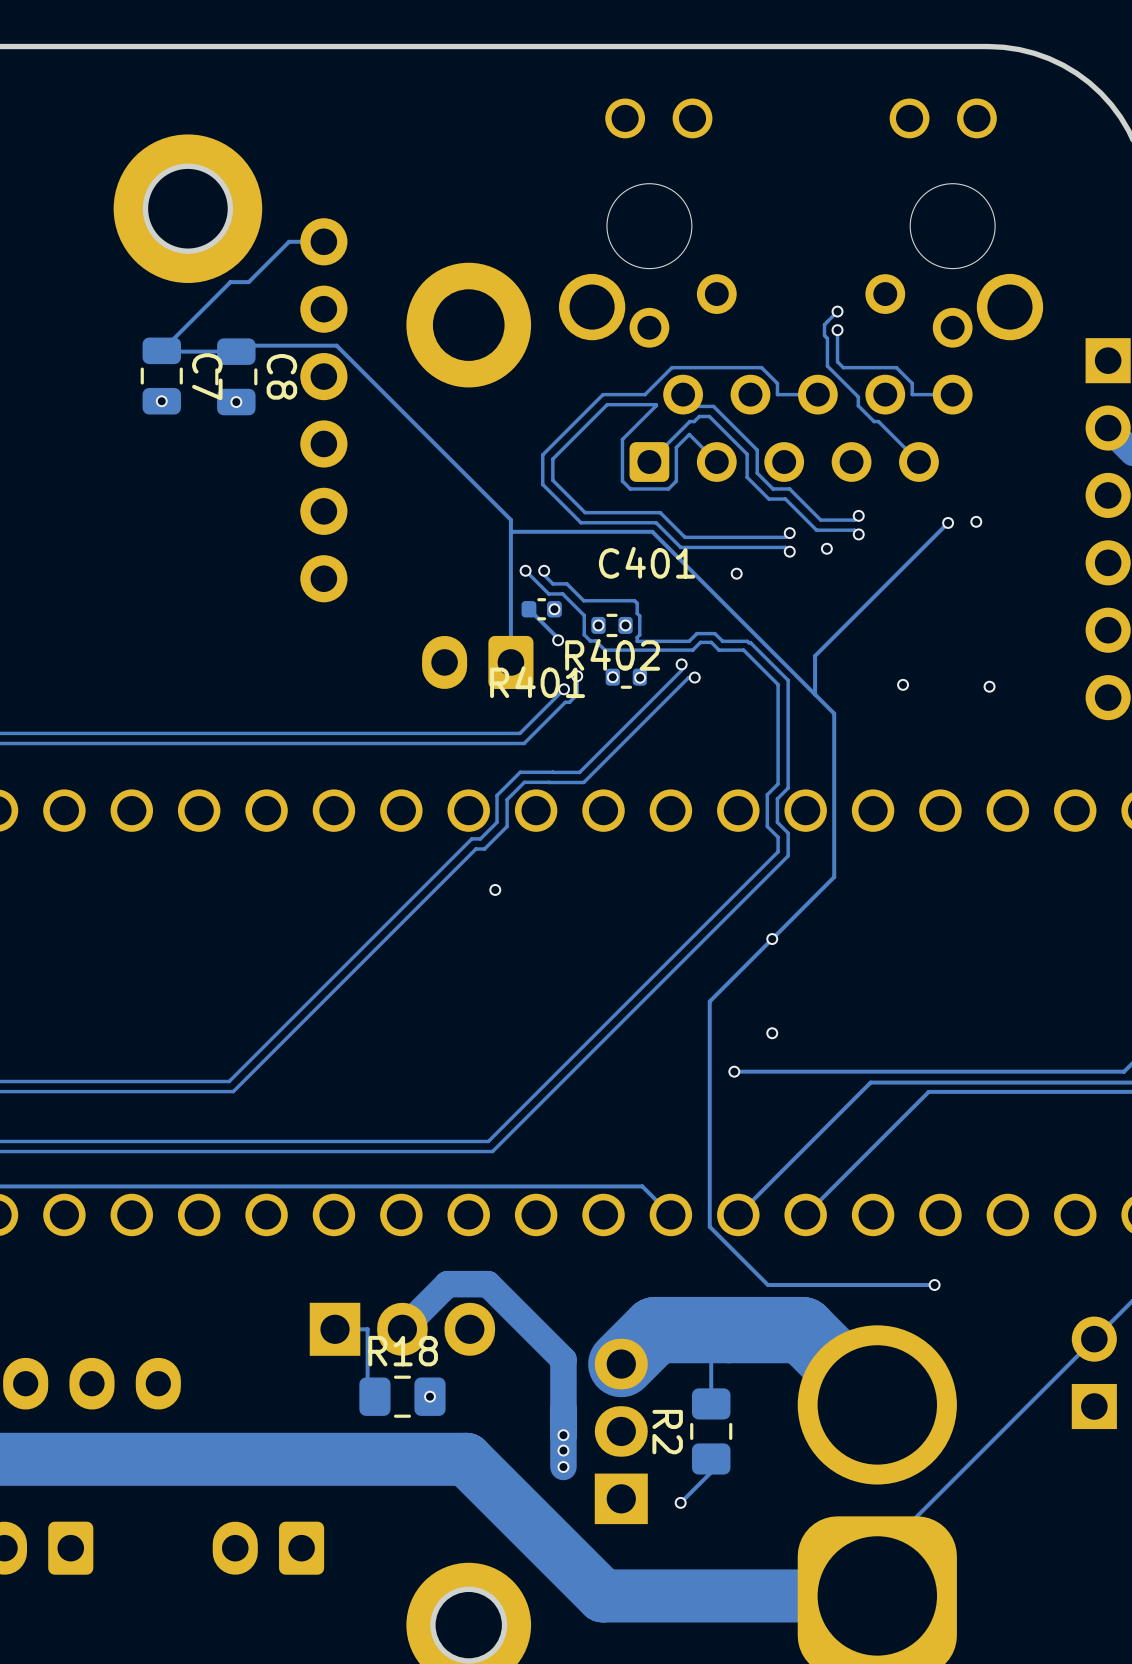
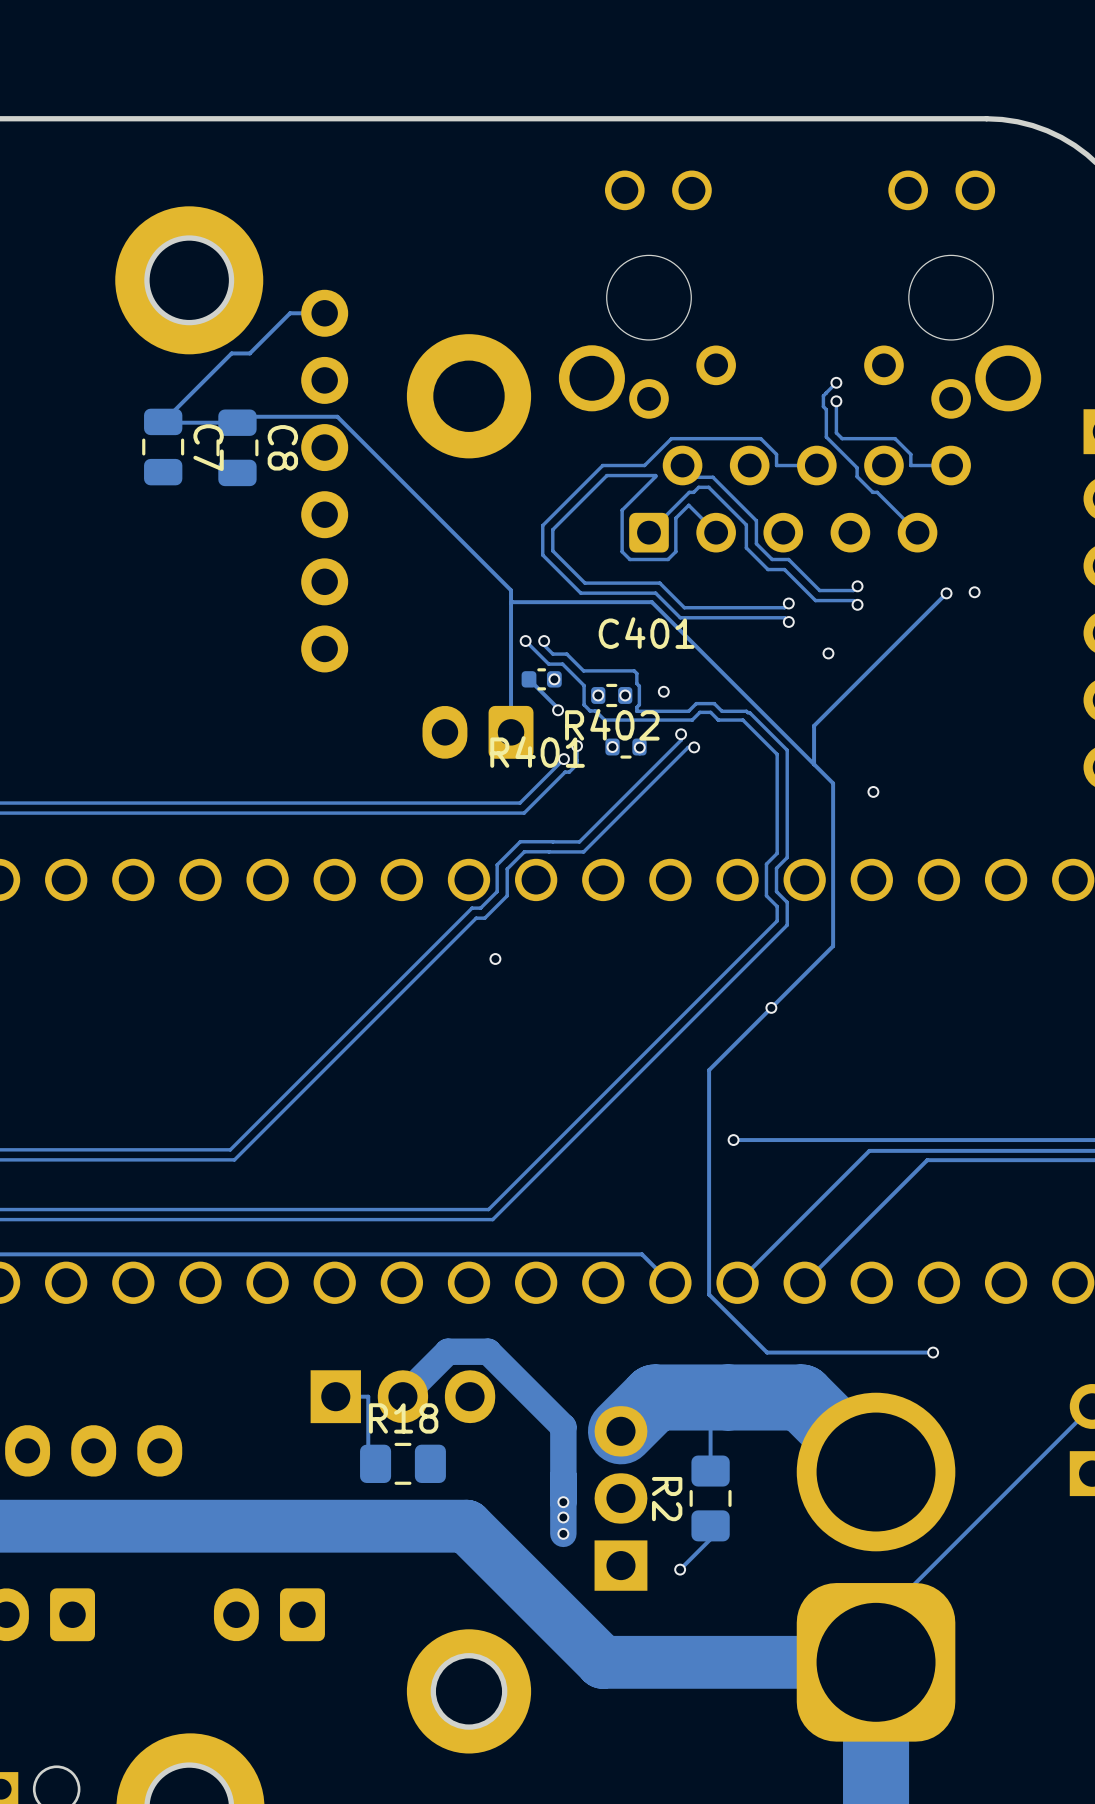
via: (161, 401) -> none
via: (236, 402) -> none
via position: (826, 548) -> (828, 653)
via: (736, 573) -> none
via: none -> (663, 691)
via position: (903, 684) -> (873, 791)
via: (989, 686) -> none
via: (772, 1033) -> none
via: (430, 1396) -> none

